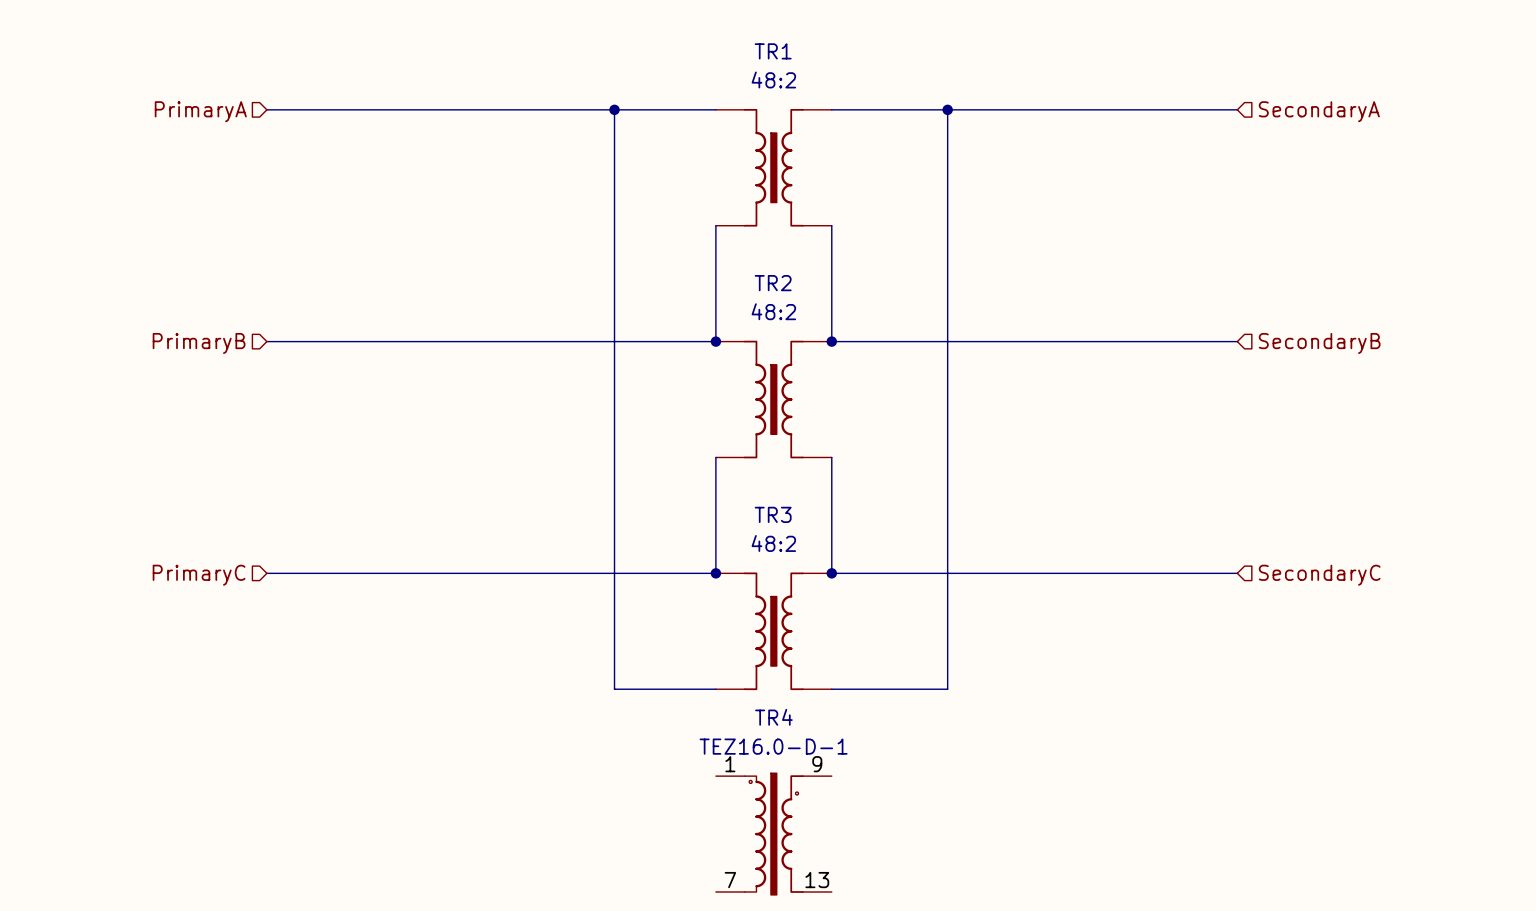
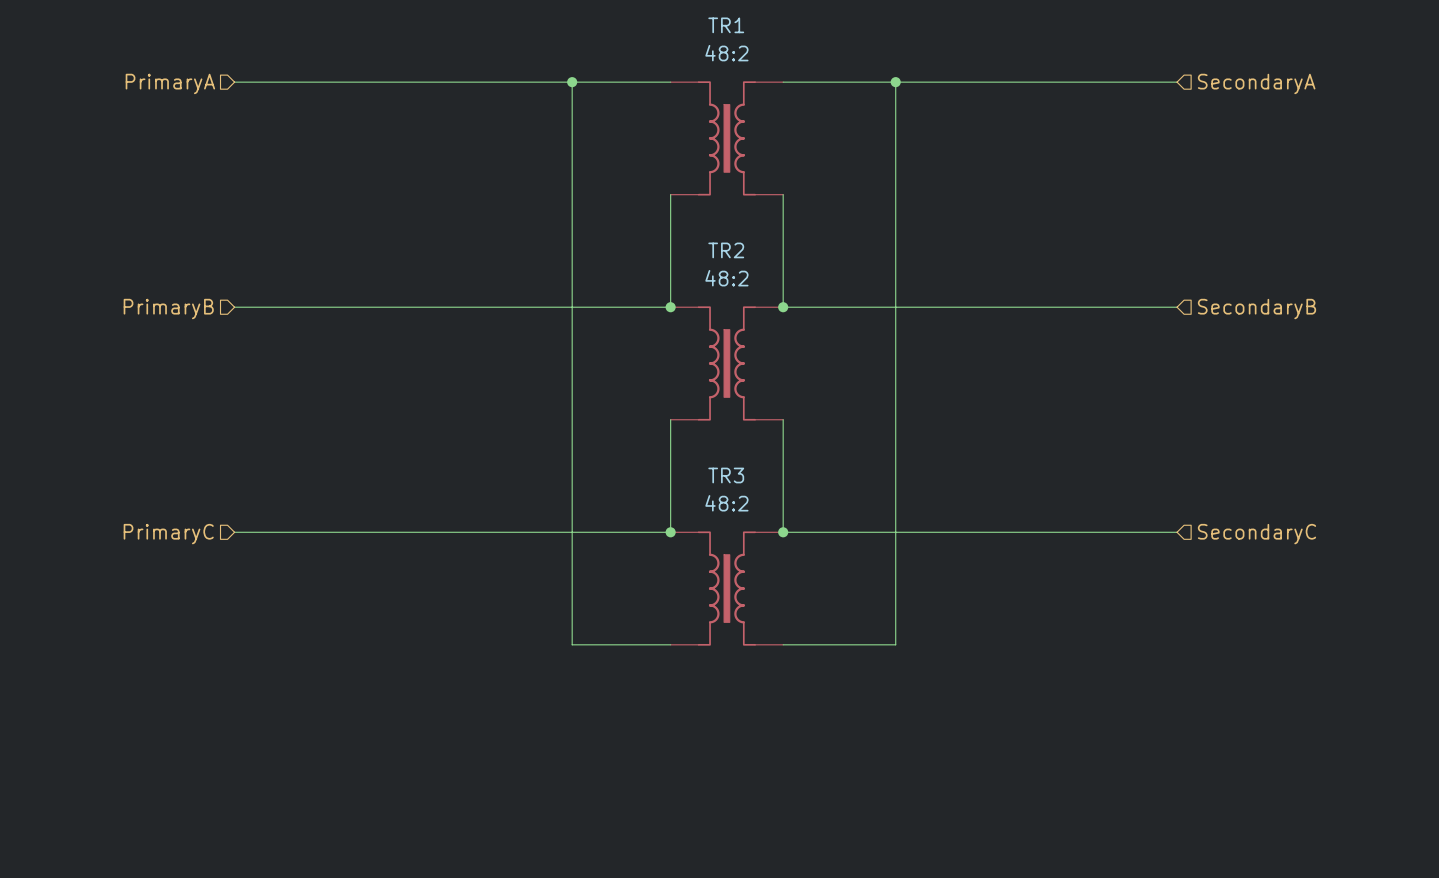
TR4: TEZ16.0-D-1 (773, 834) -> none

